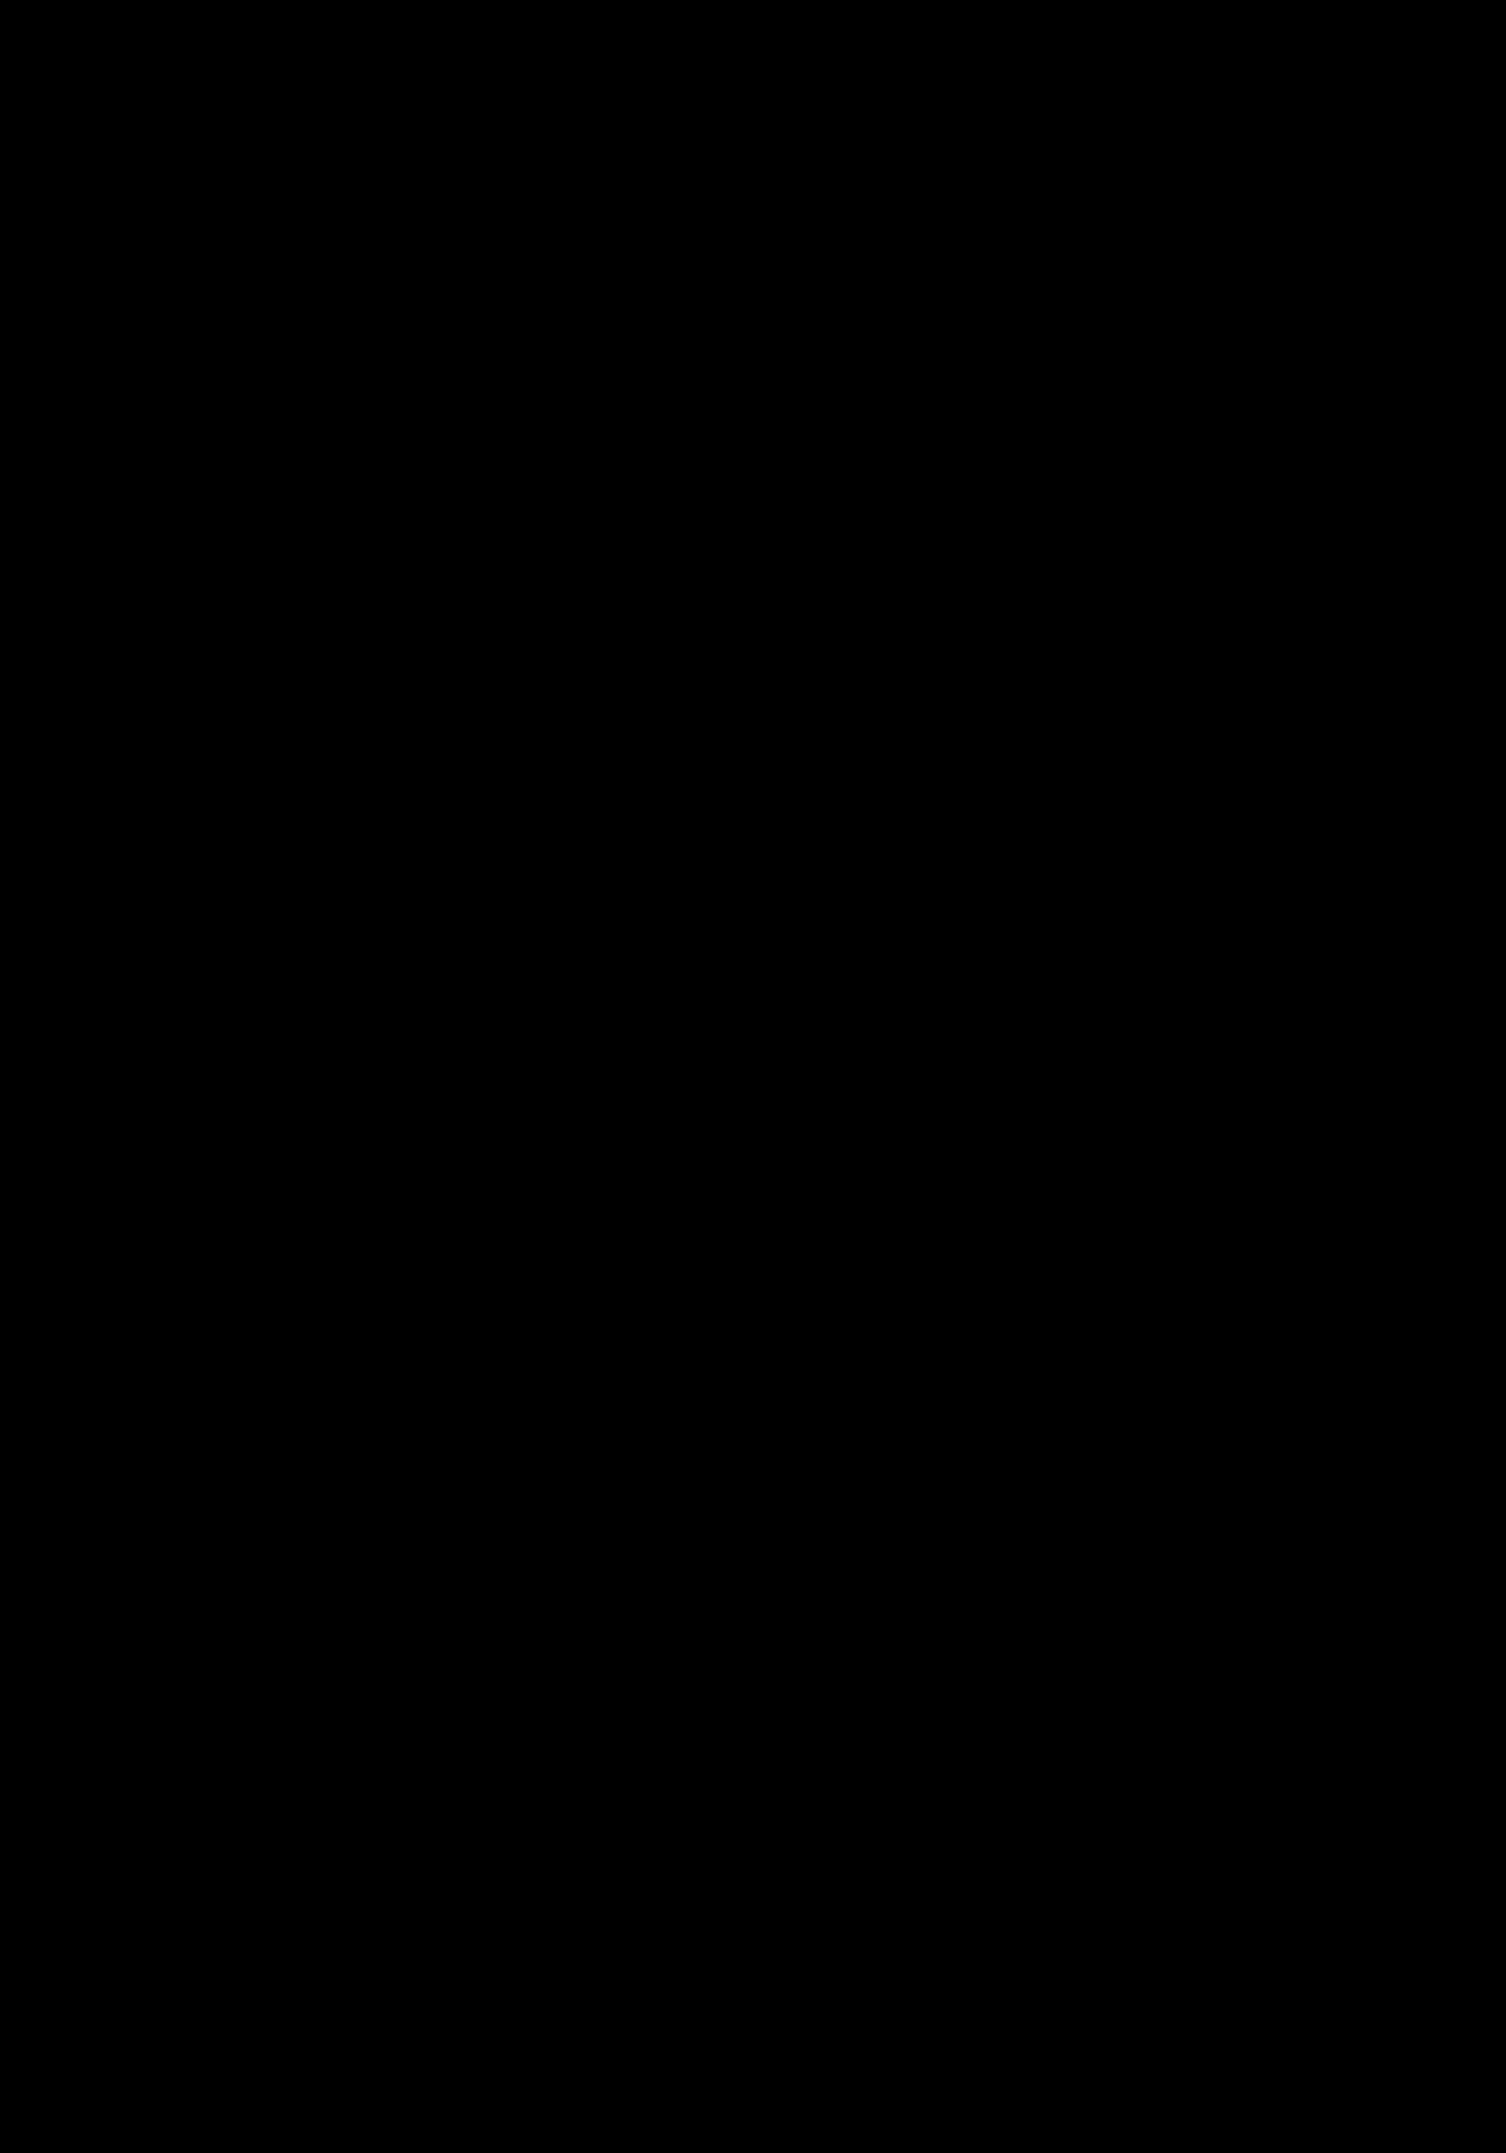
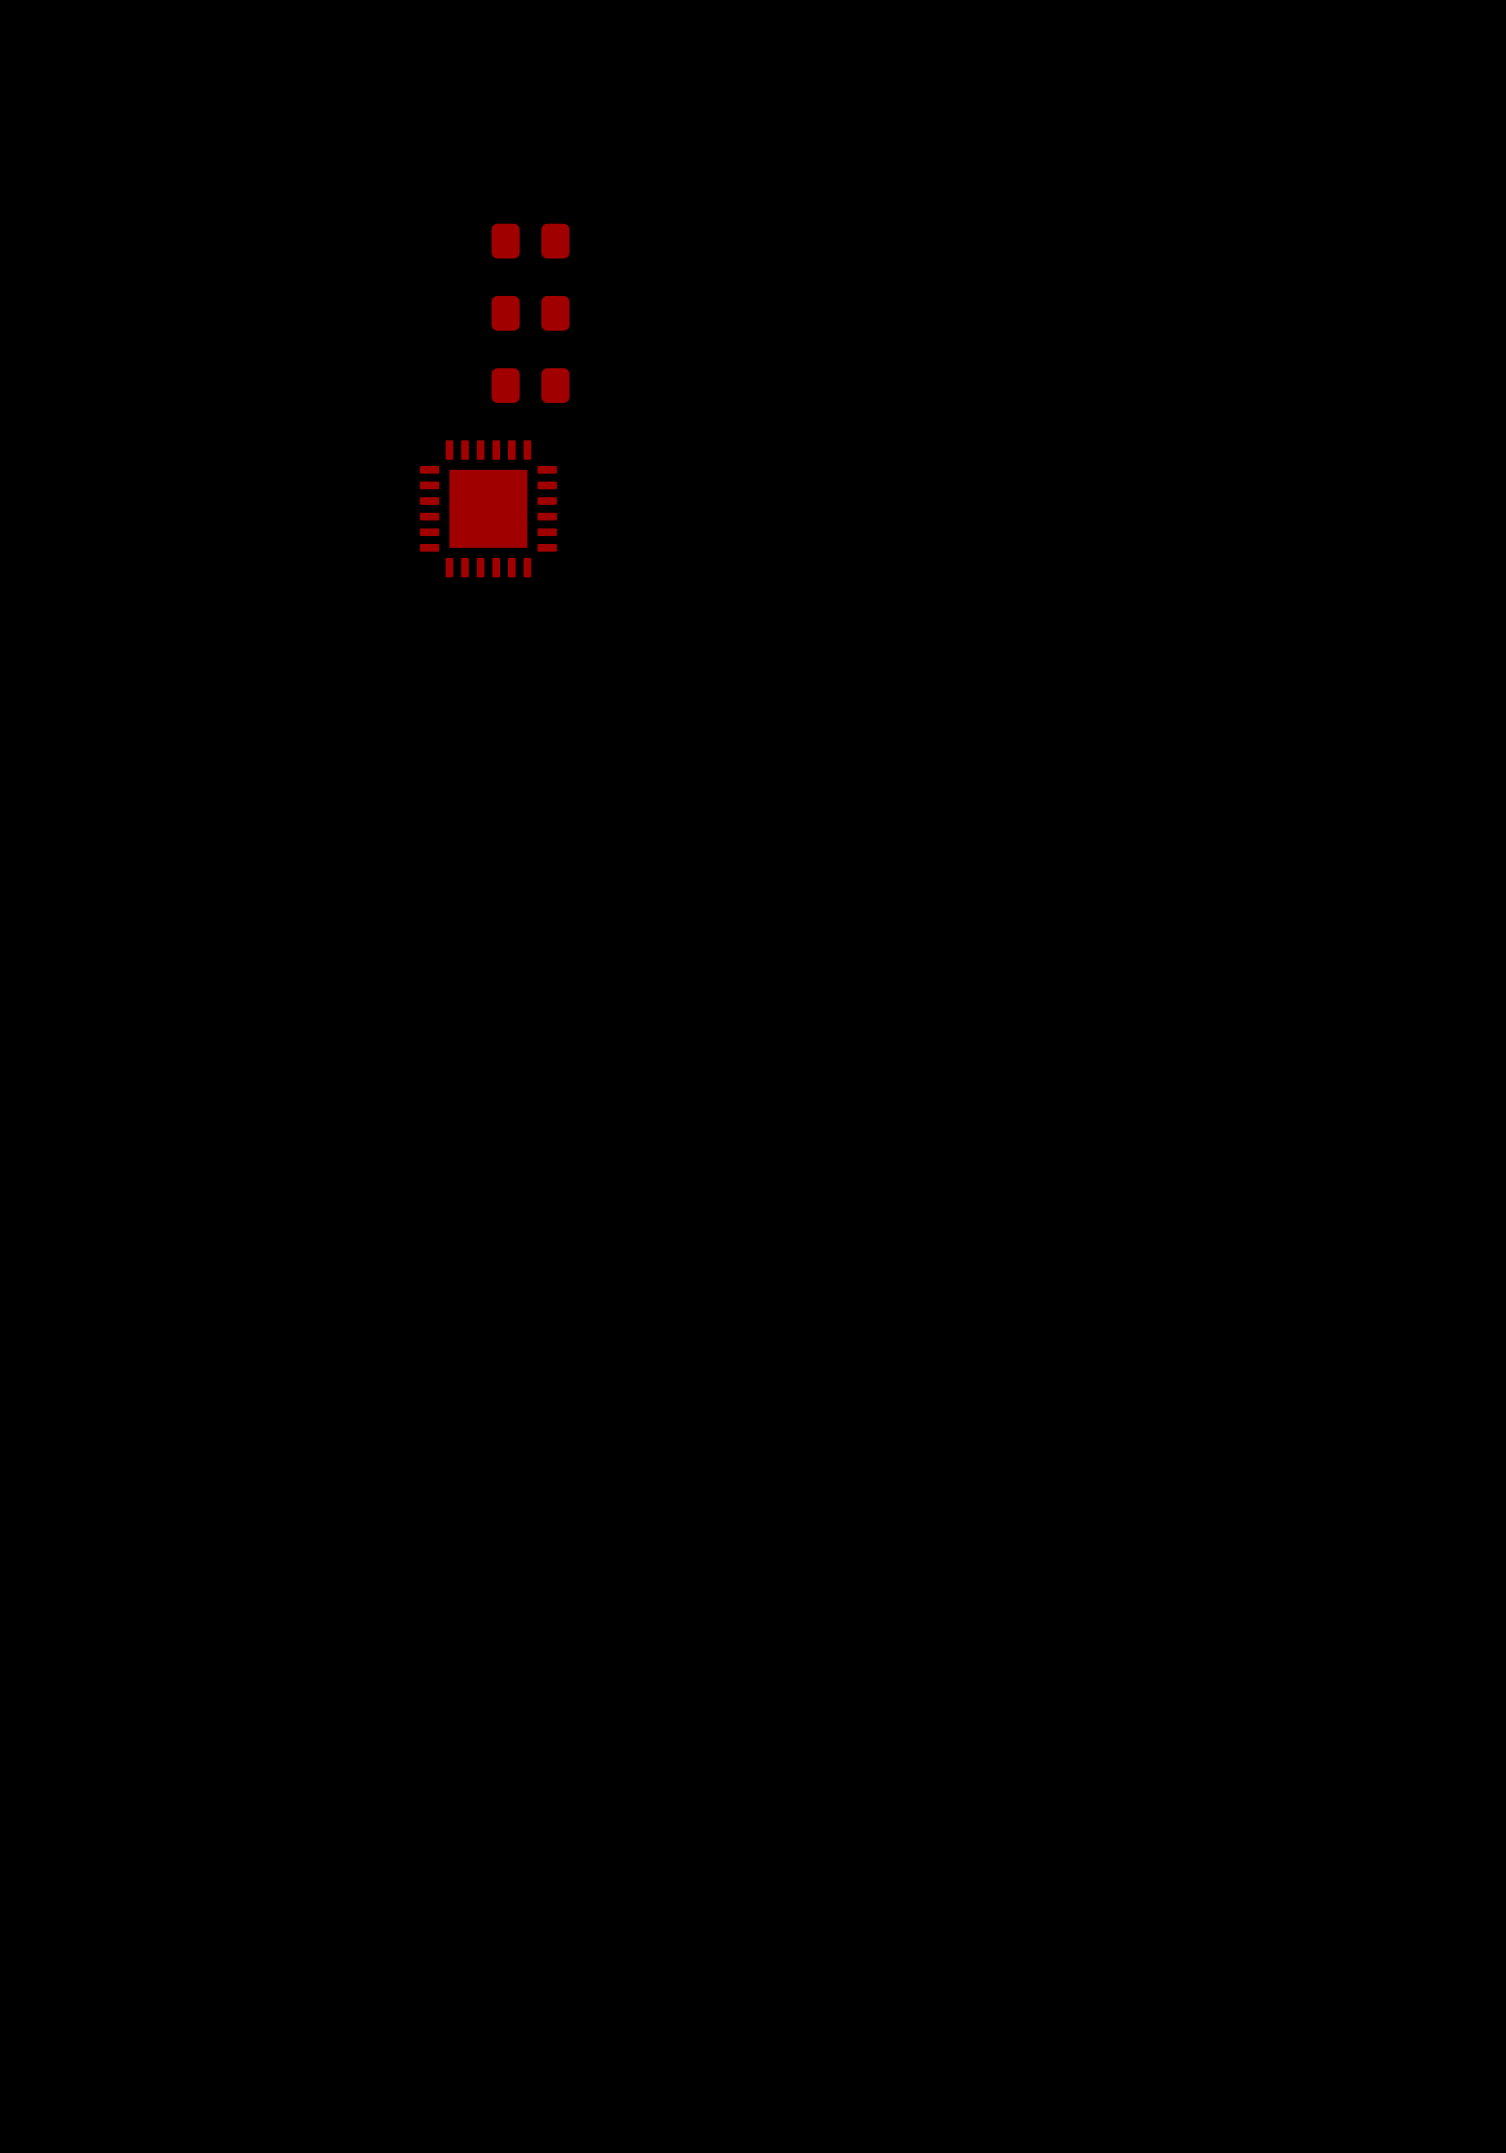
part: none -> (530, 241)
part: none -> (530, 313)
part: none -> (530, 385)
part: none -> (488, 508)

